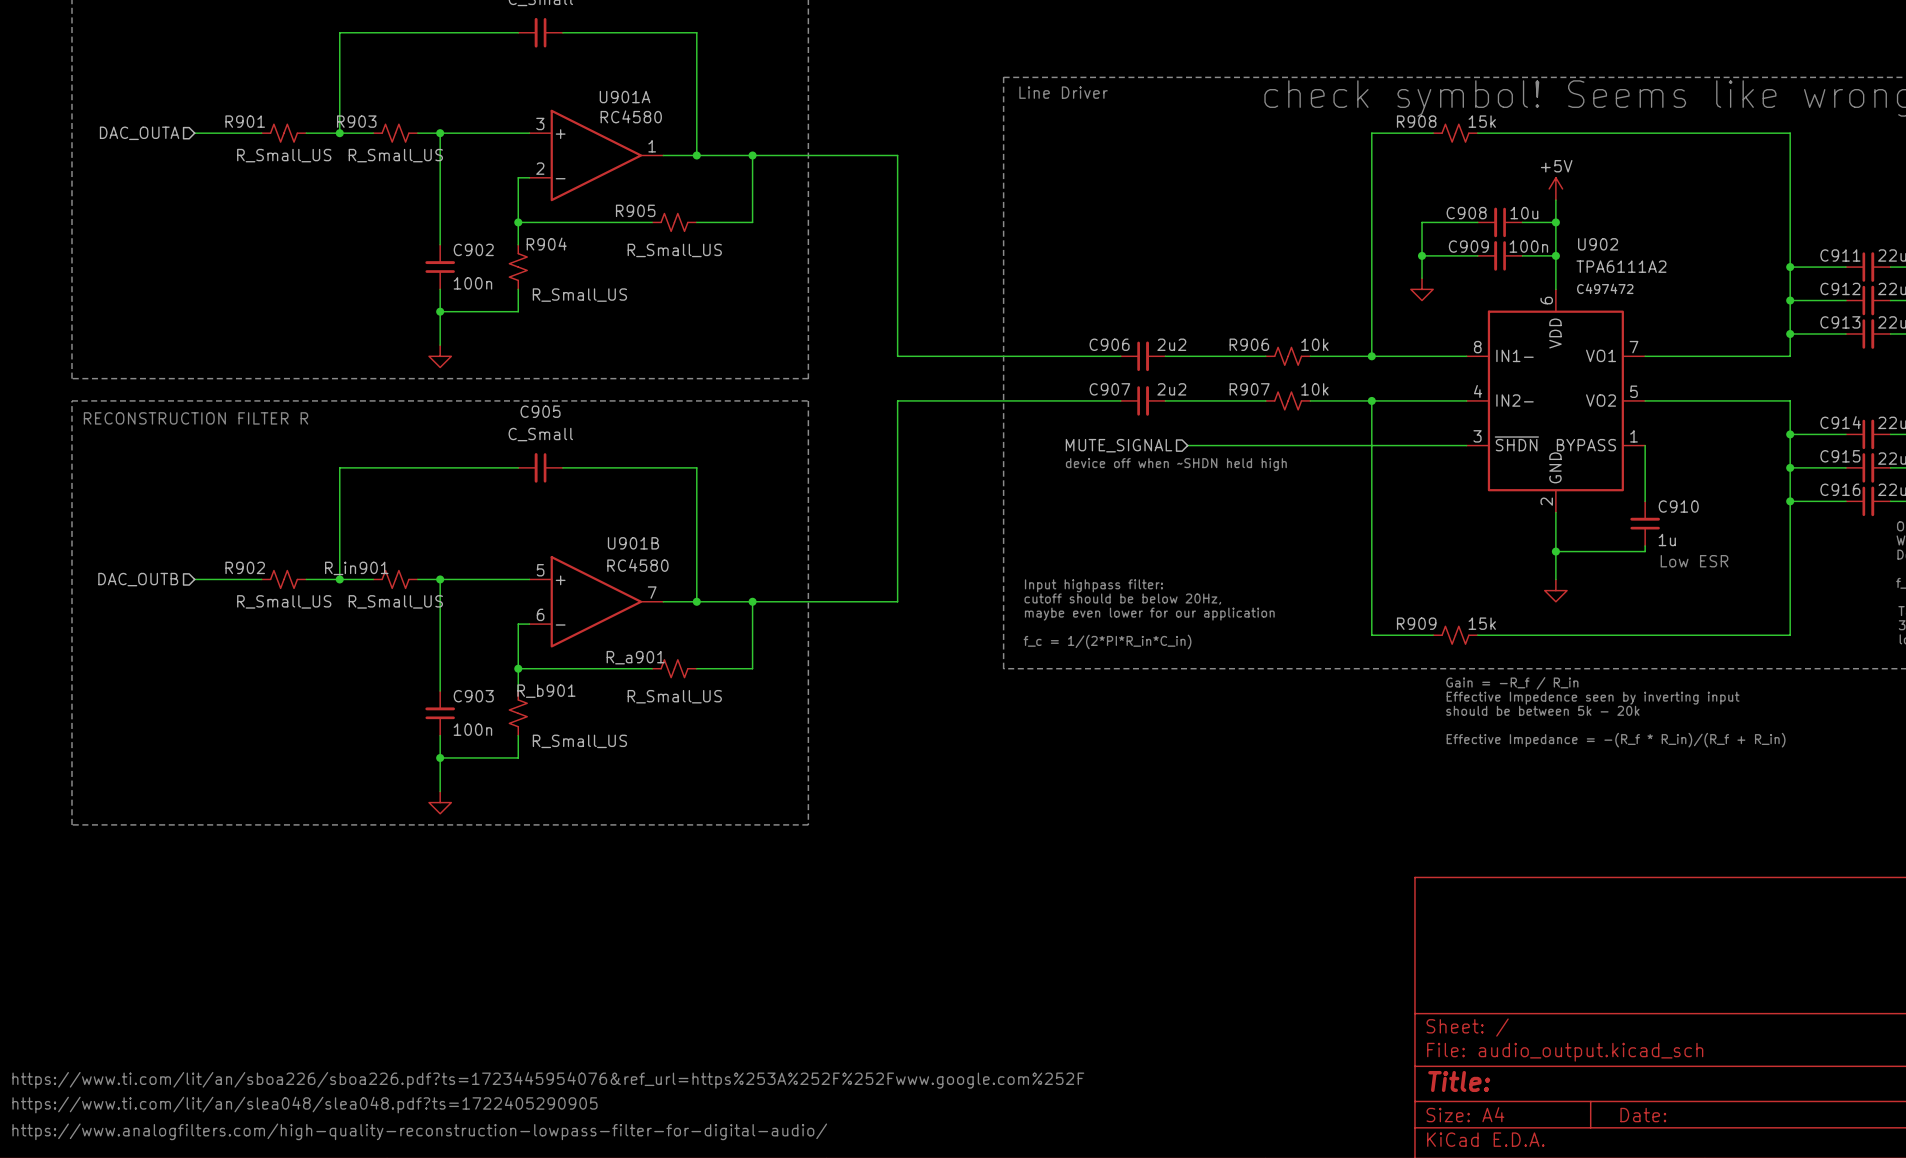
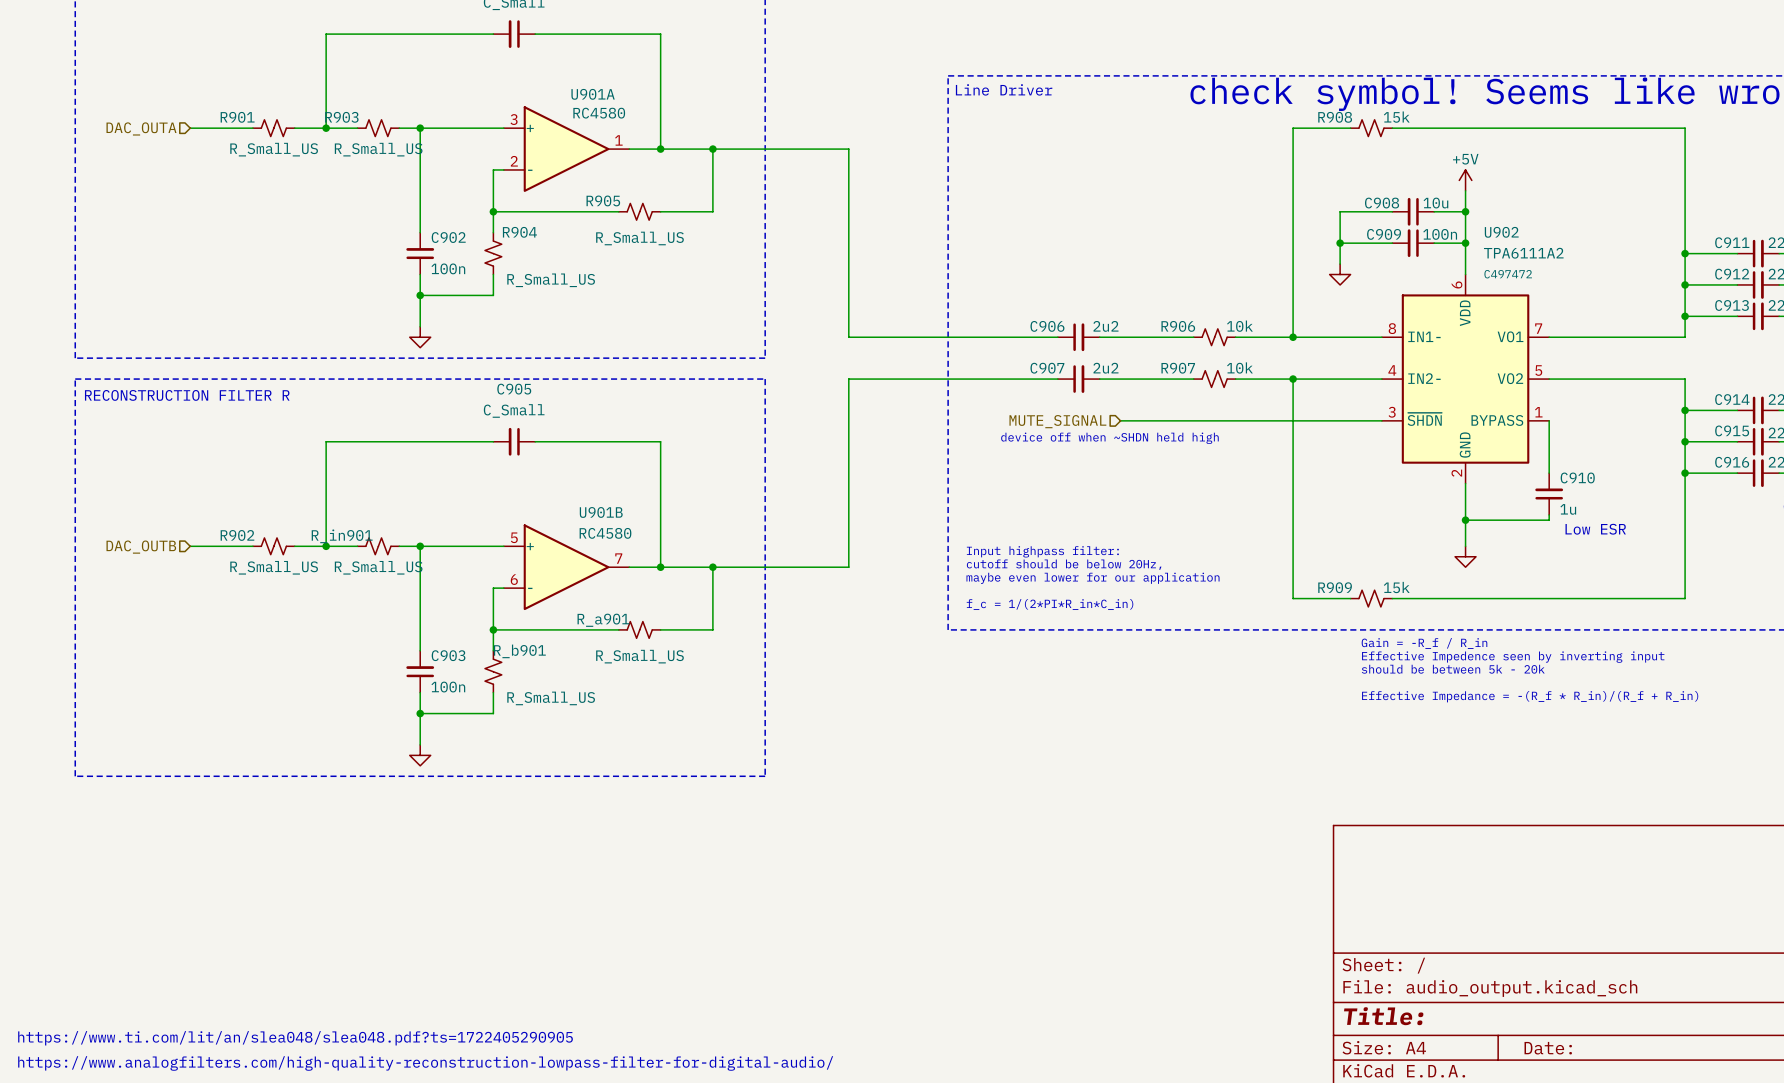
text: https://www.ti.com/lit/an/sboa226/sboa226.pdf?ts=1723445954076&ref_url=https%253A%252F%252Fwww.google.com%252F (548, 1080) -> none

